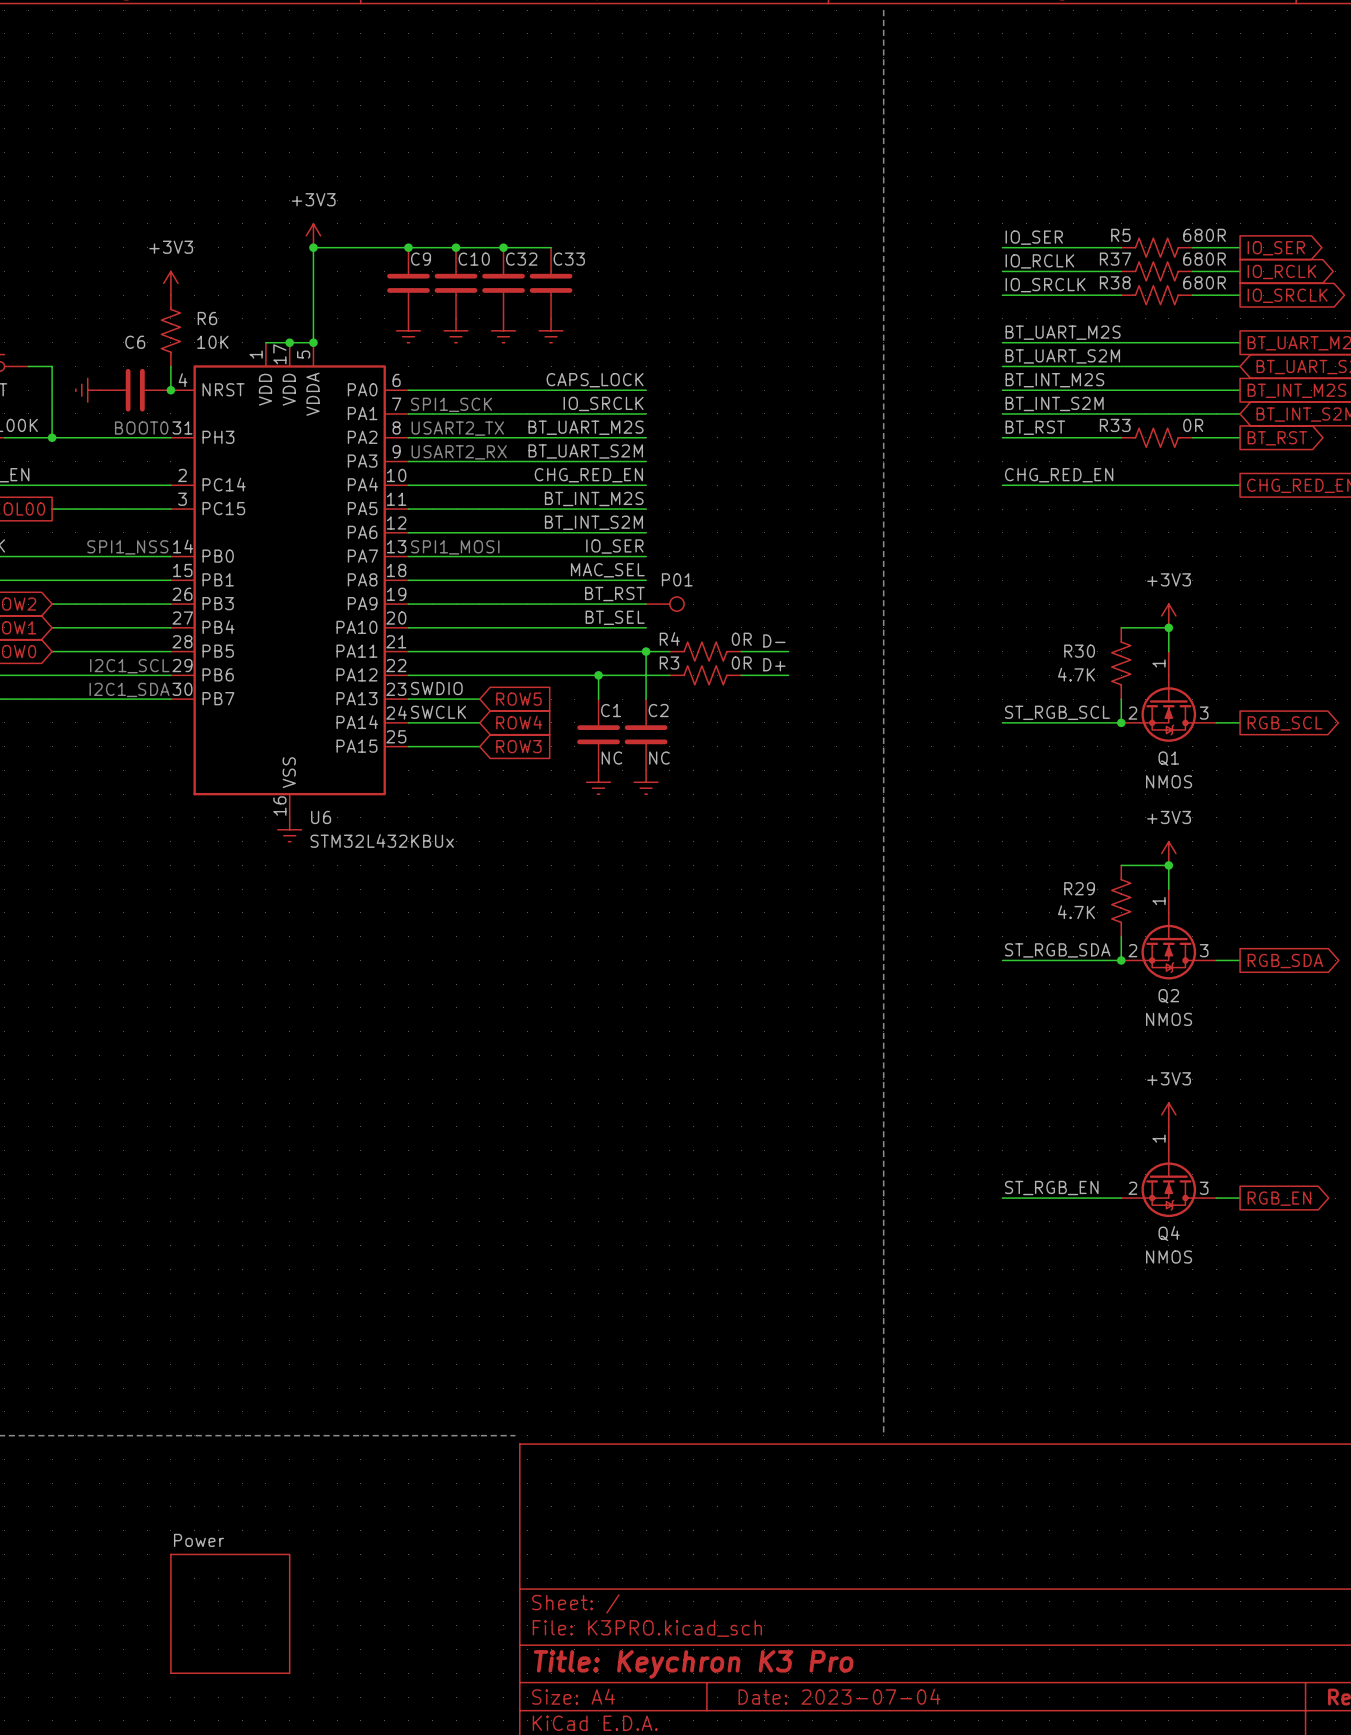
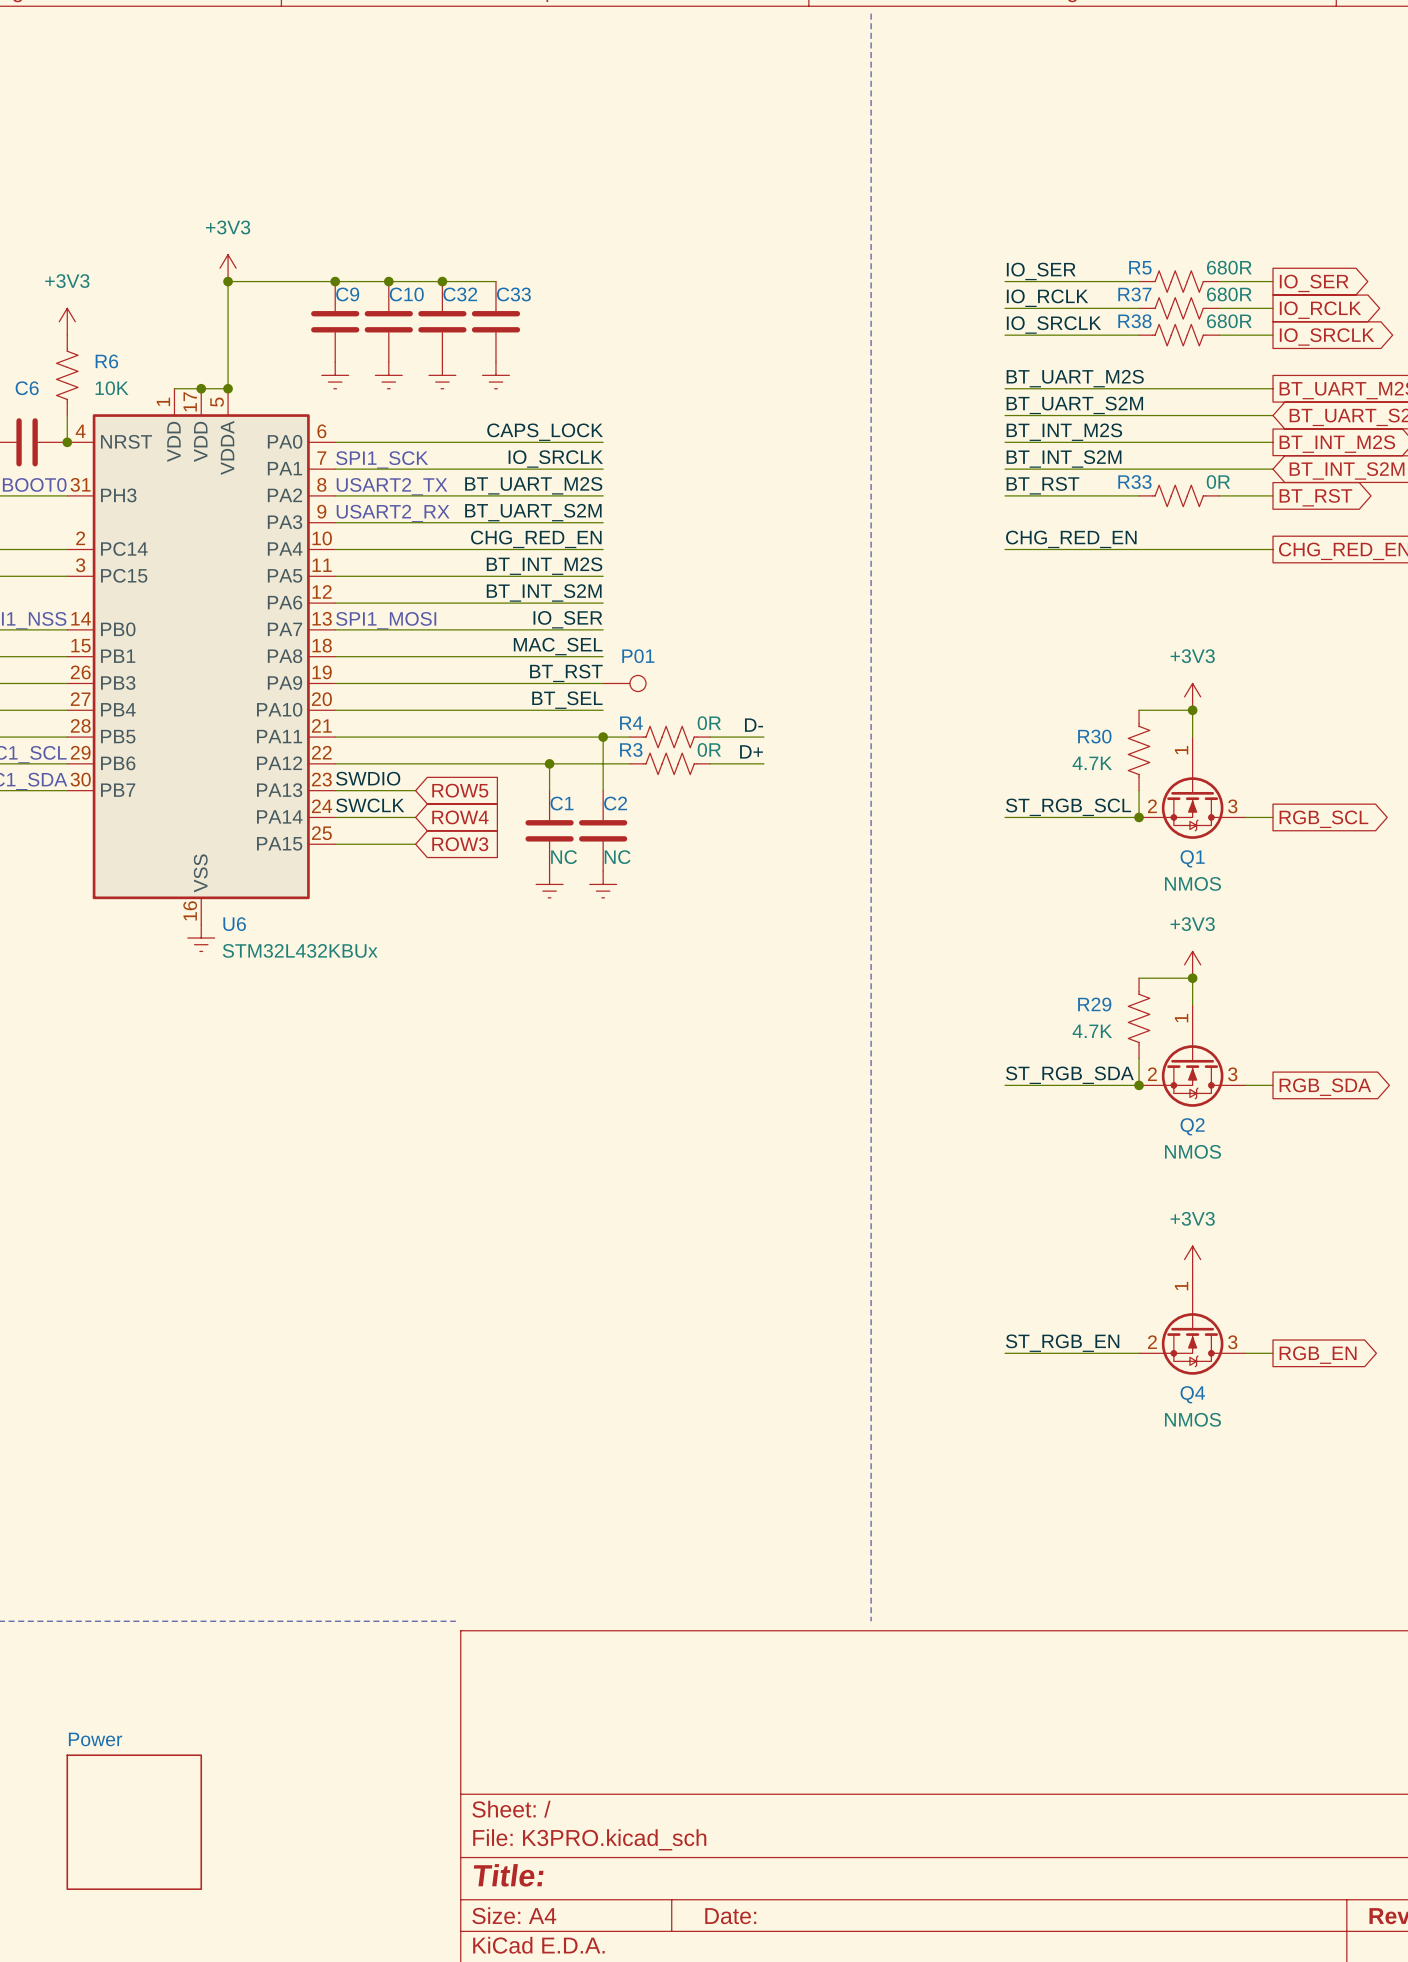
title block: Title: Keychron K3 Pro (693, 1664) -> Title: (508, 1875)
title block: Date: 2023-07-04 (839, 1696) -> Date: (730, 1916)

